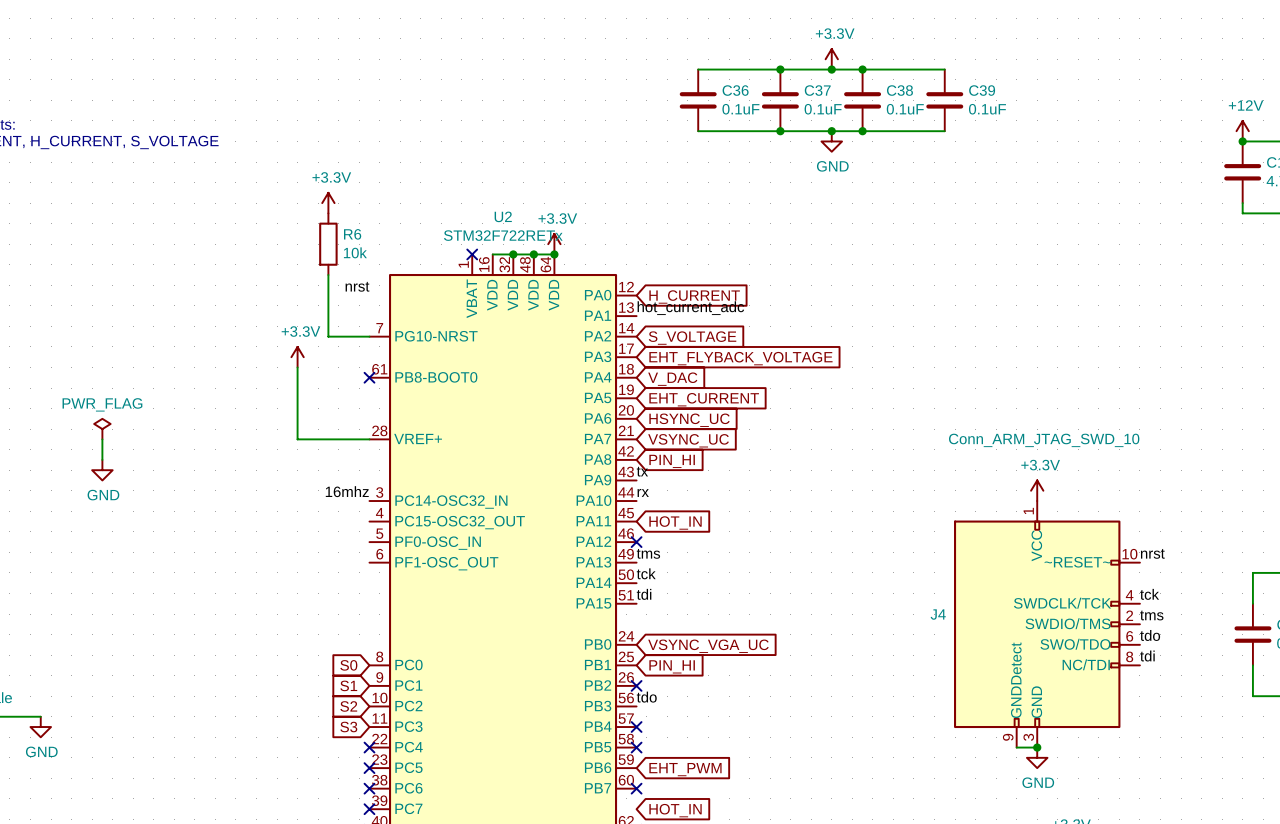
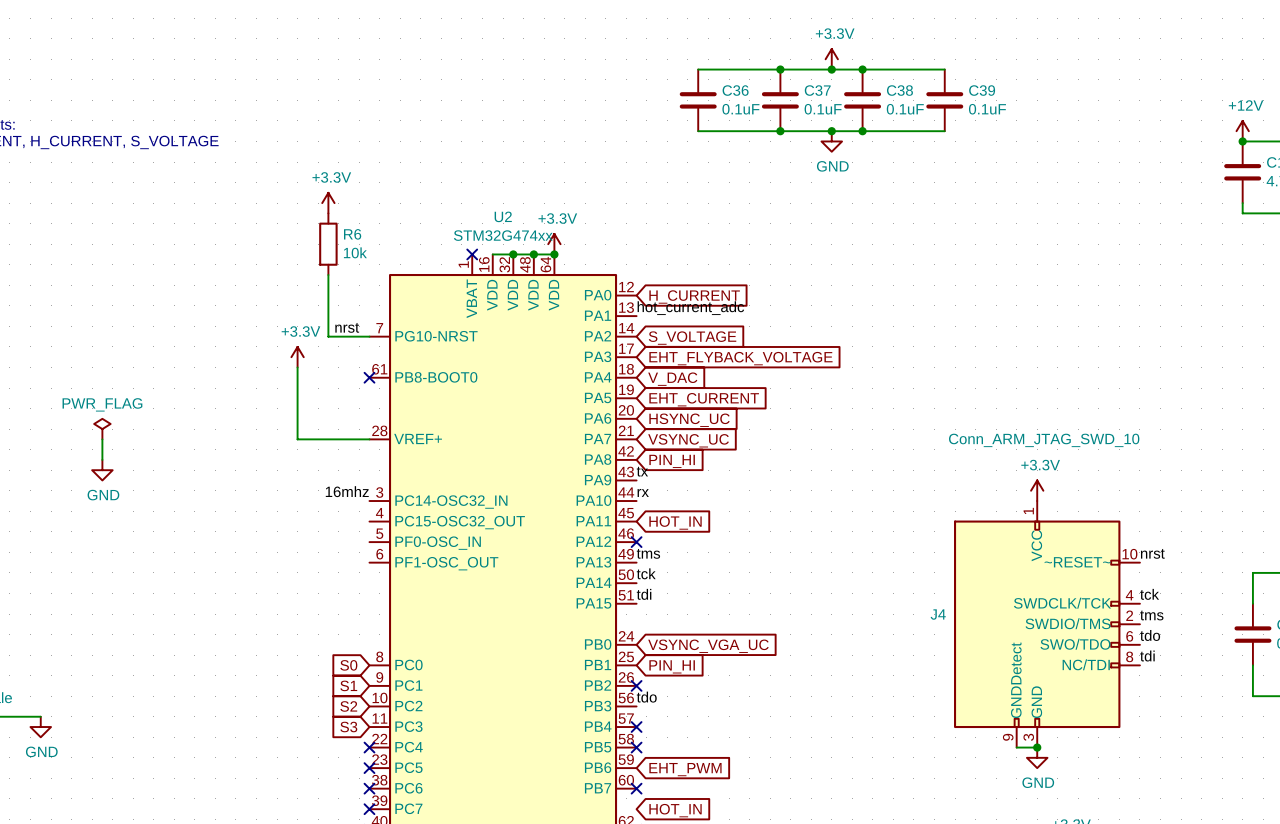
U2 value: STM32F722RETx (503, 235) -> STM32G474xx (503, 235)
label position: nrst (357, 286) -> nrst (347, 327)

